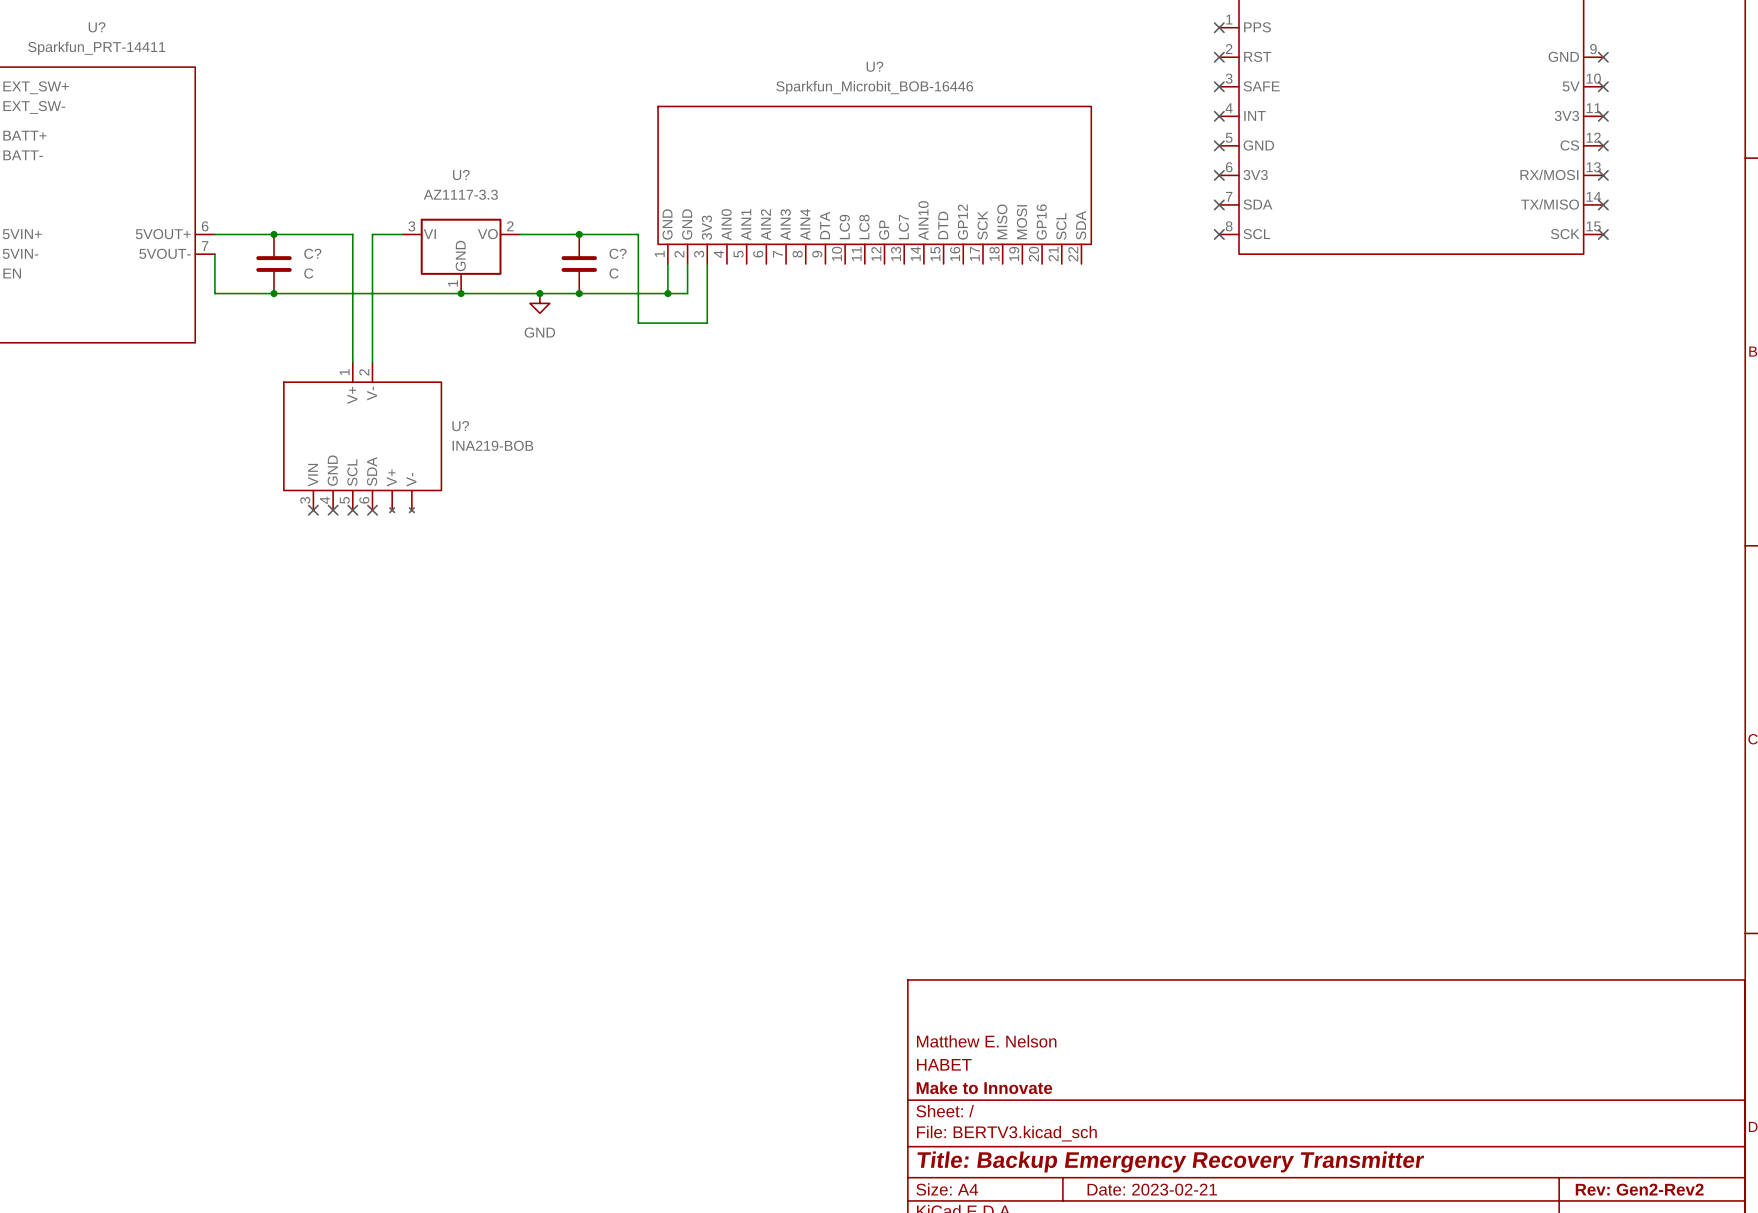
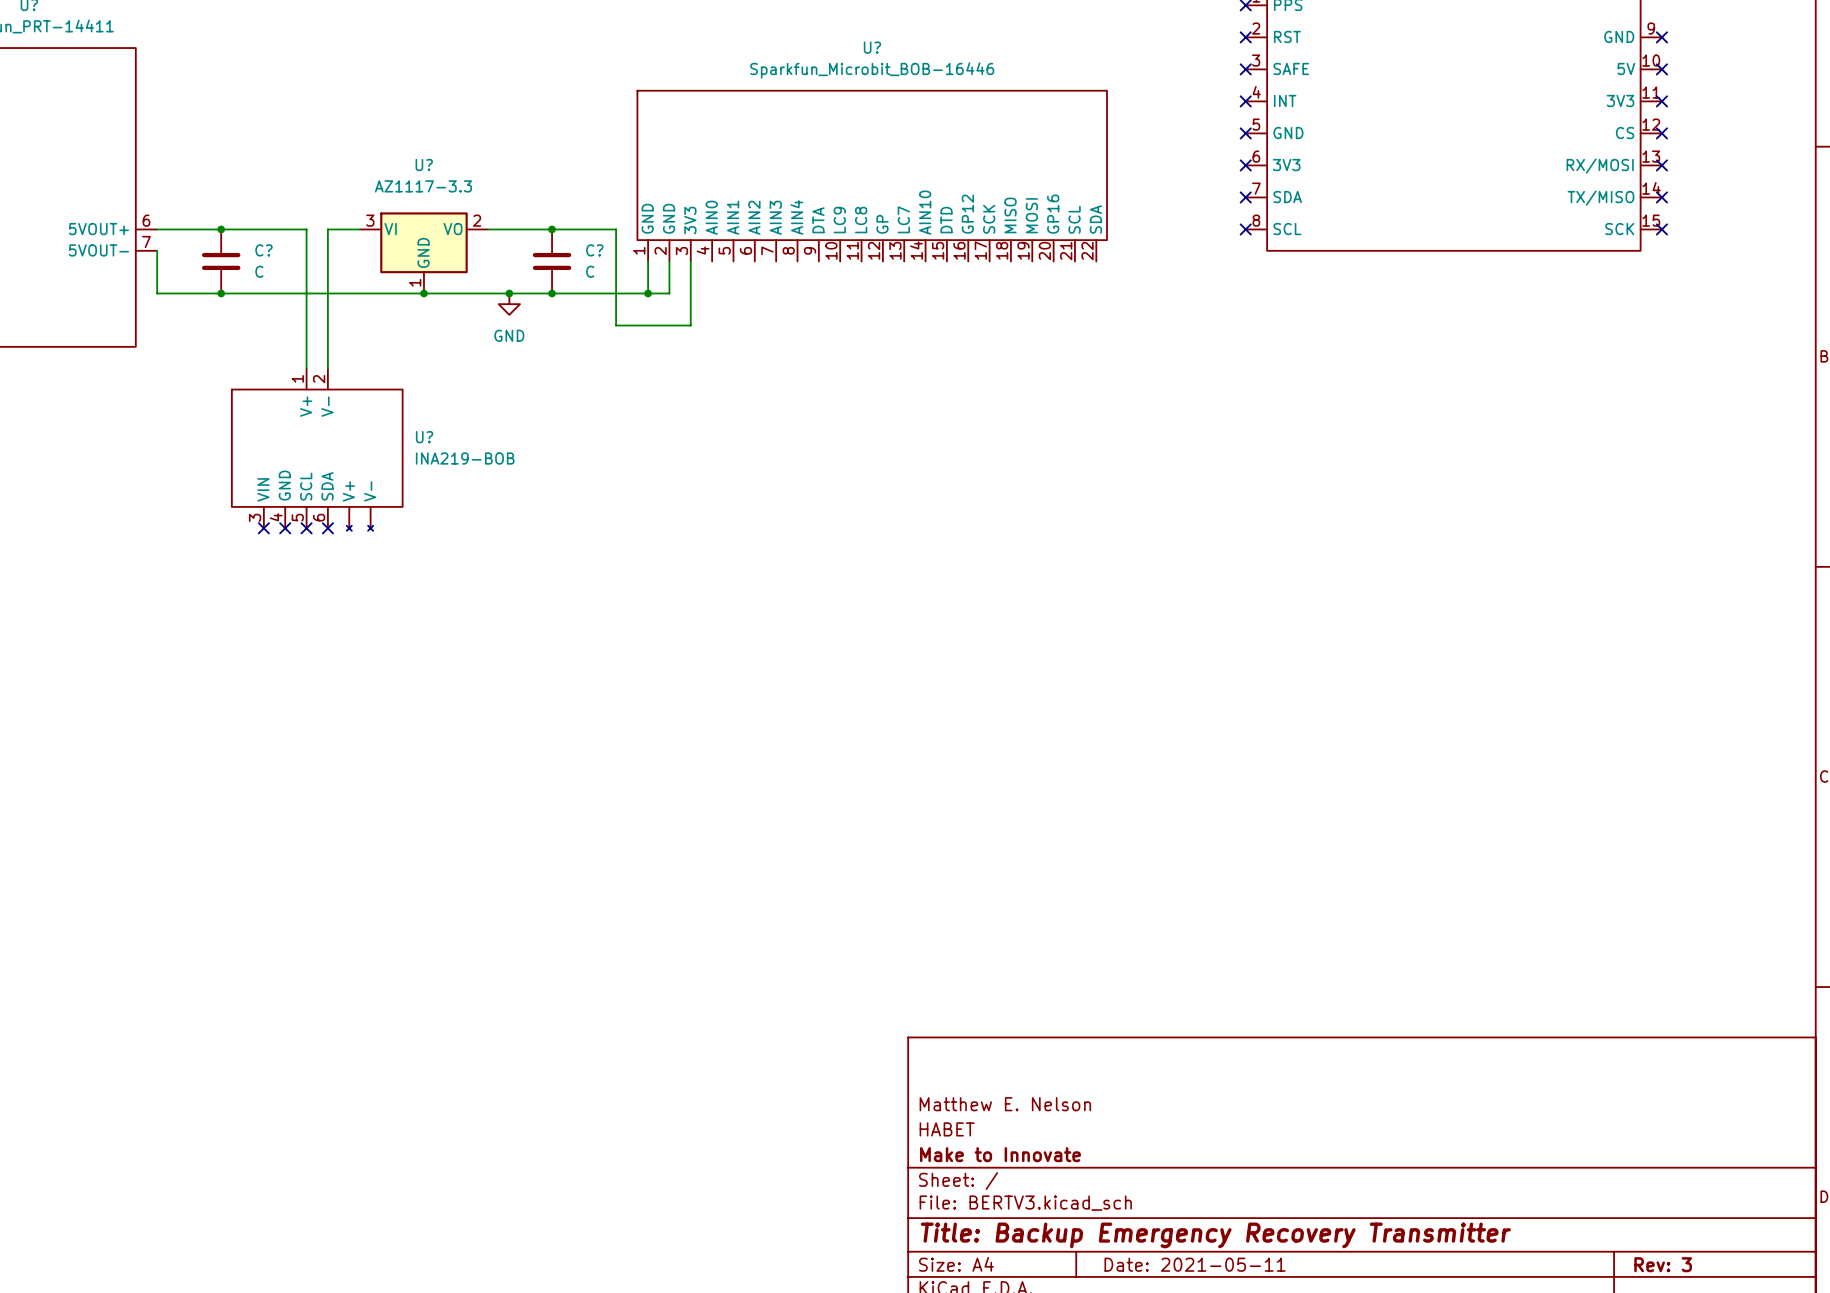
title block: Date: 2023-02-21 (1152, 1189) -> Date: 2021-05-11 (1195, 1264)
title block: Rev: Gen2-Rev2 (1639, 1189) -> Rev: 3 (1663, 1264)

